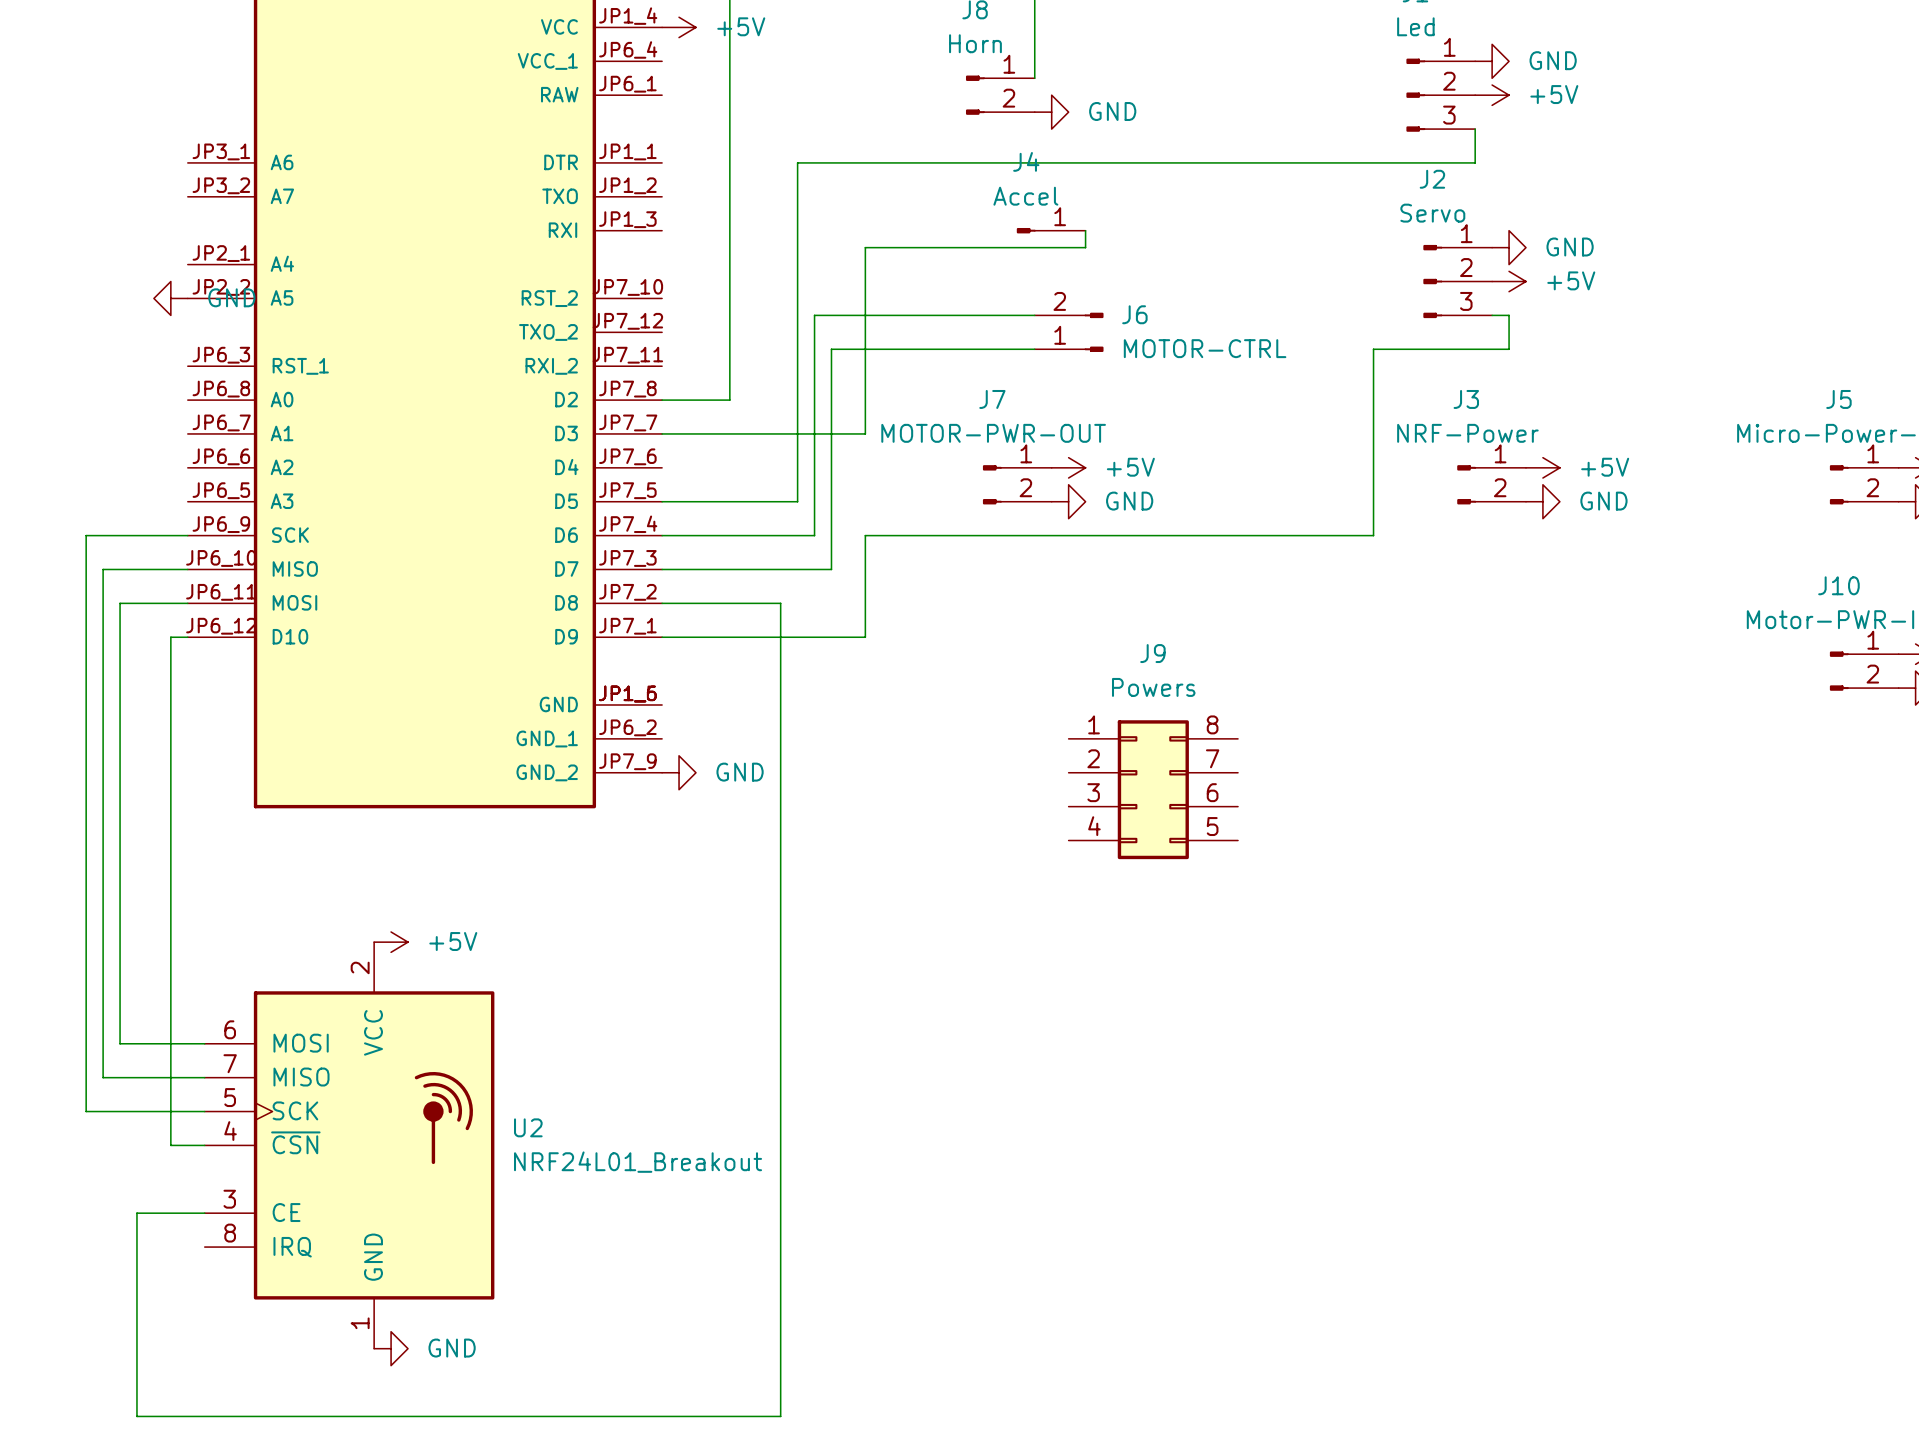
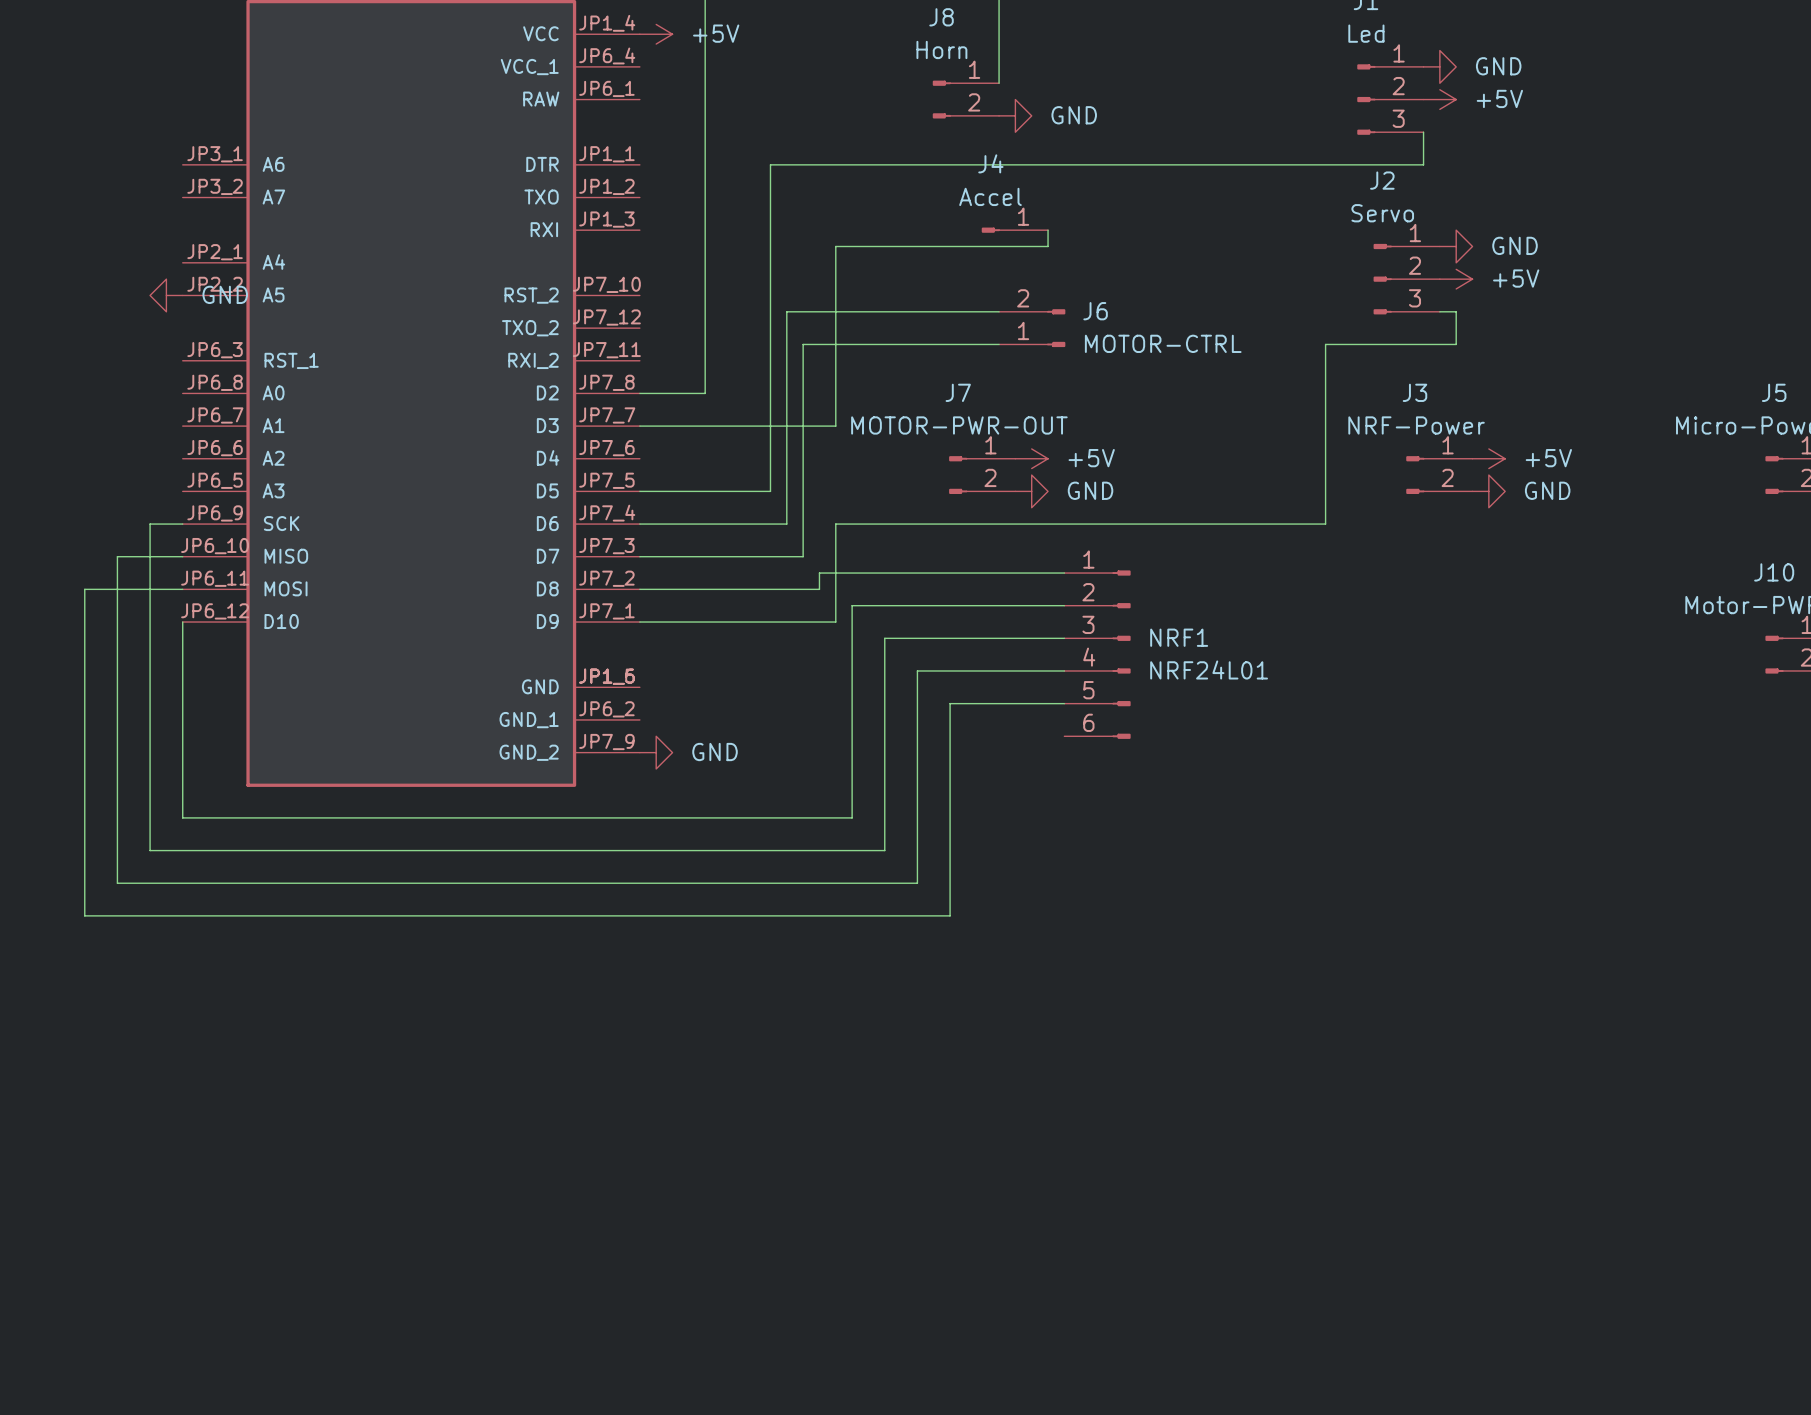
wire: (153, 535) (86, 535) (86, 603) -> (117, 556) (117, 589) (84, 589)
wire: none -> (150, 524) (150, 850) (884, 850) (884, 638) (1064, 638)
wire: (120, 569) (103, 569) (103, 1077) (204, 1077) -> none
wire: (780, 603) (780, 1416) (136, 1416) (136, 1213) (204, 1213) -> (754, 589) (819, 589) (819, 573) (1064, 573)
wire: (187, 637) (170, 637) (170, 1145) (204, 1145) -> (182, 622) (182, 817) (852, 817) (852, 605) (1064, 605)
NRF1: none -> NRF24L01 (1097, 654)
J9: Powers (1153, 789) -> none
wire: (120, 908) (120, 1043) (204, 1043) -> (117, 883) (917, 883) (917, 670) (1064, 670)
wire: (86, 942) (86, 1111) (204, 1111) -> (84, 915) (950, 915) (950, 703) (1064, 703)
power symbol: +5V (391, 942) -> none
U2: NRF24L01_Breakout (349, 1145) -> none
power symbol: GND (391, 1348) -> none

